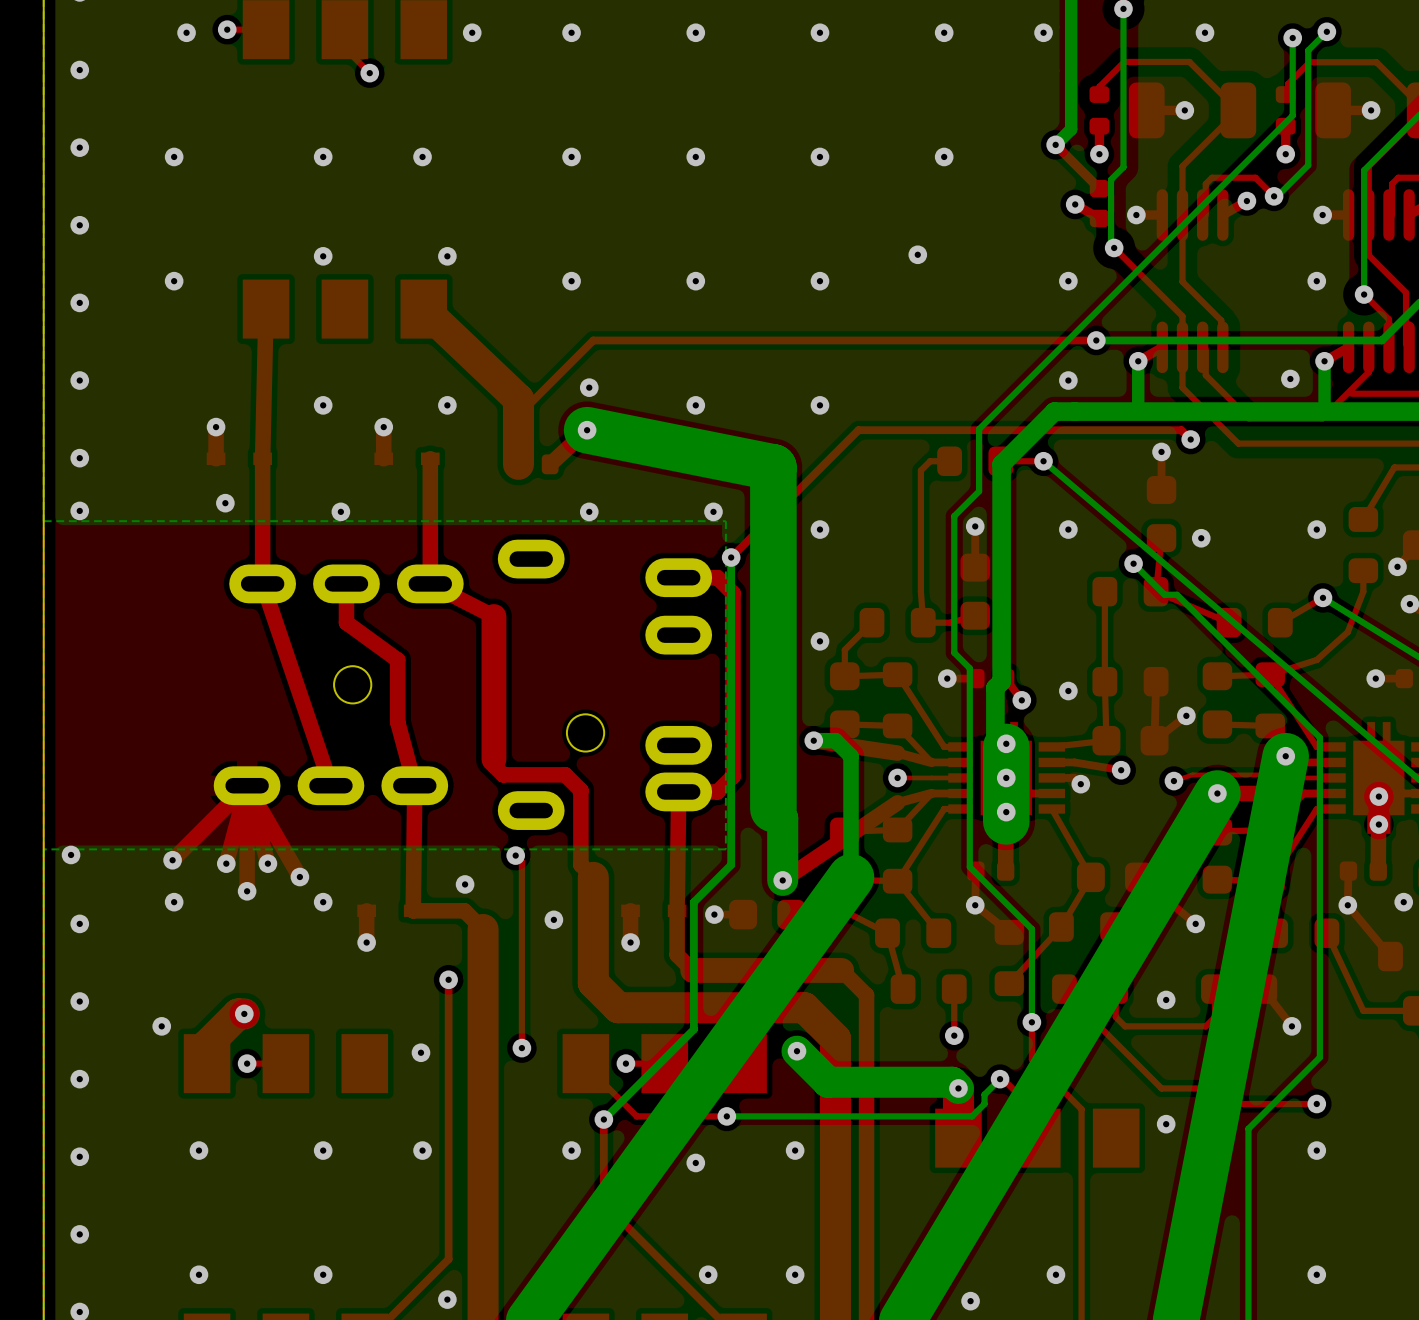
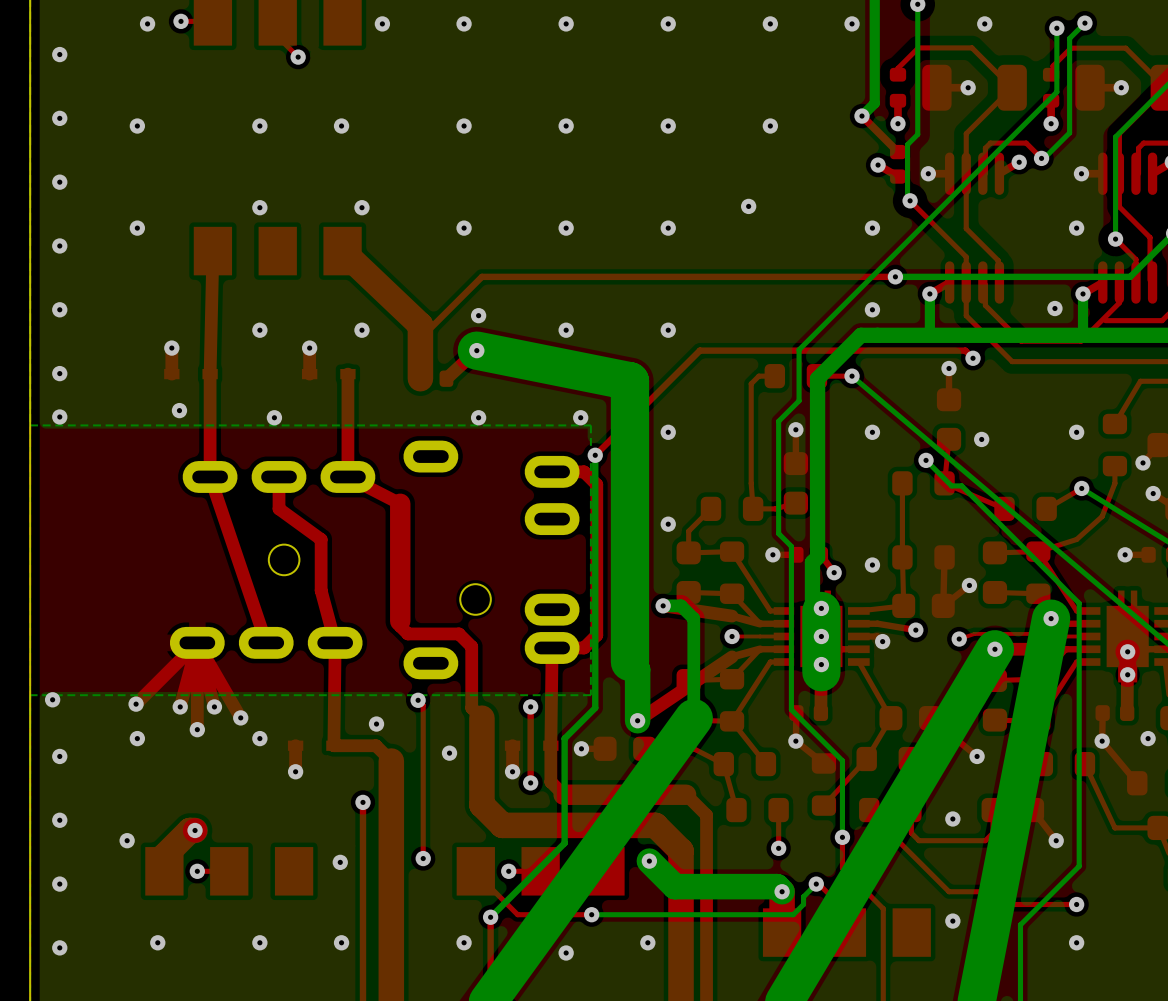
top track: none -> (530, 706) (530, 782)
via: none -> (530, 706)
via: none -> (530, 782)

